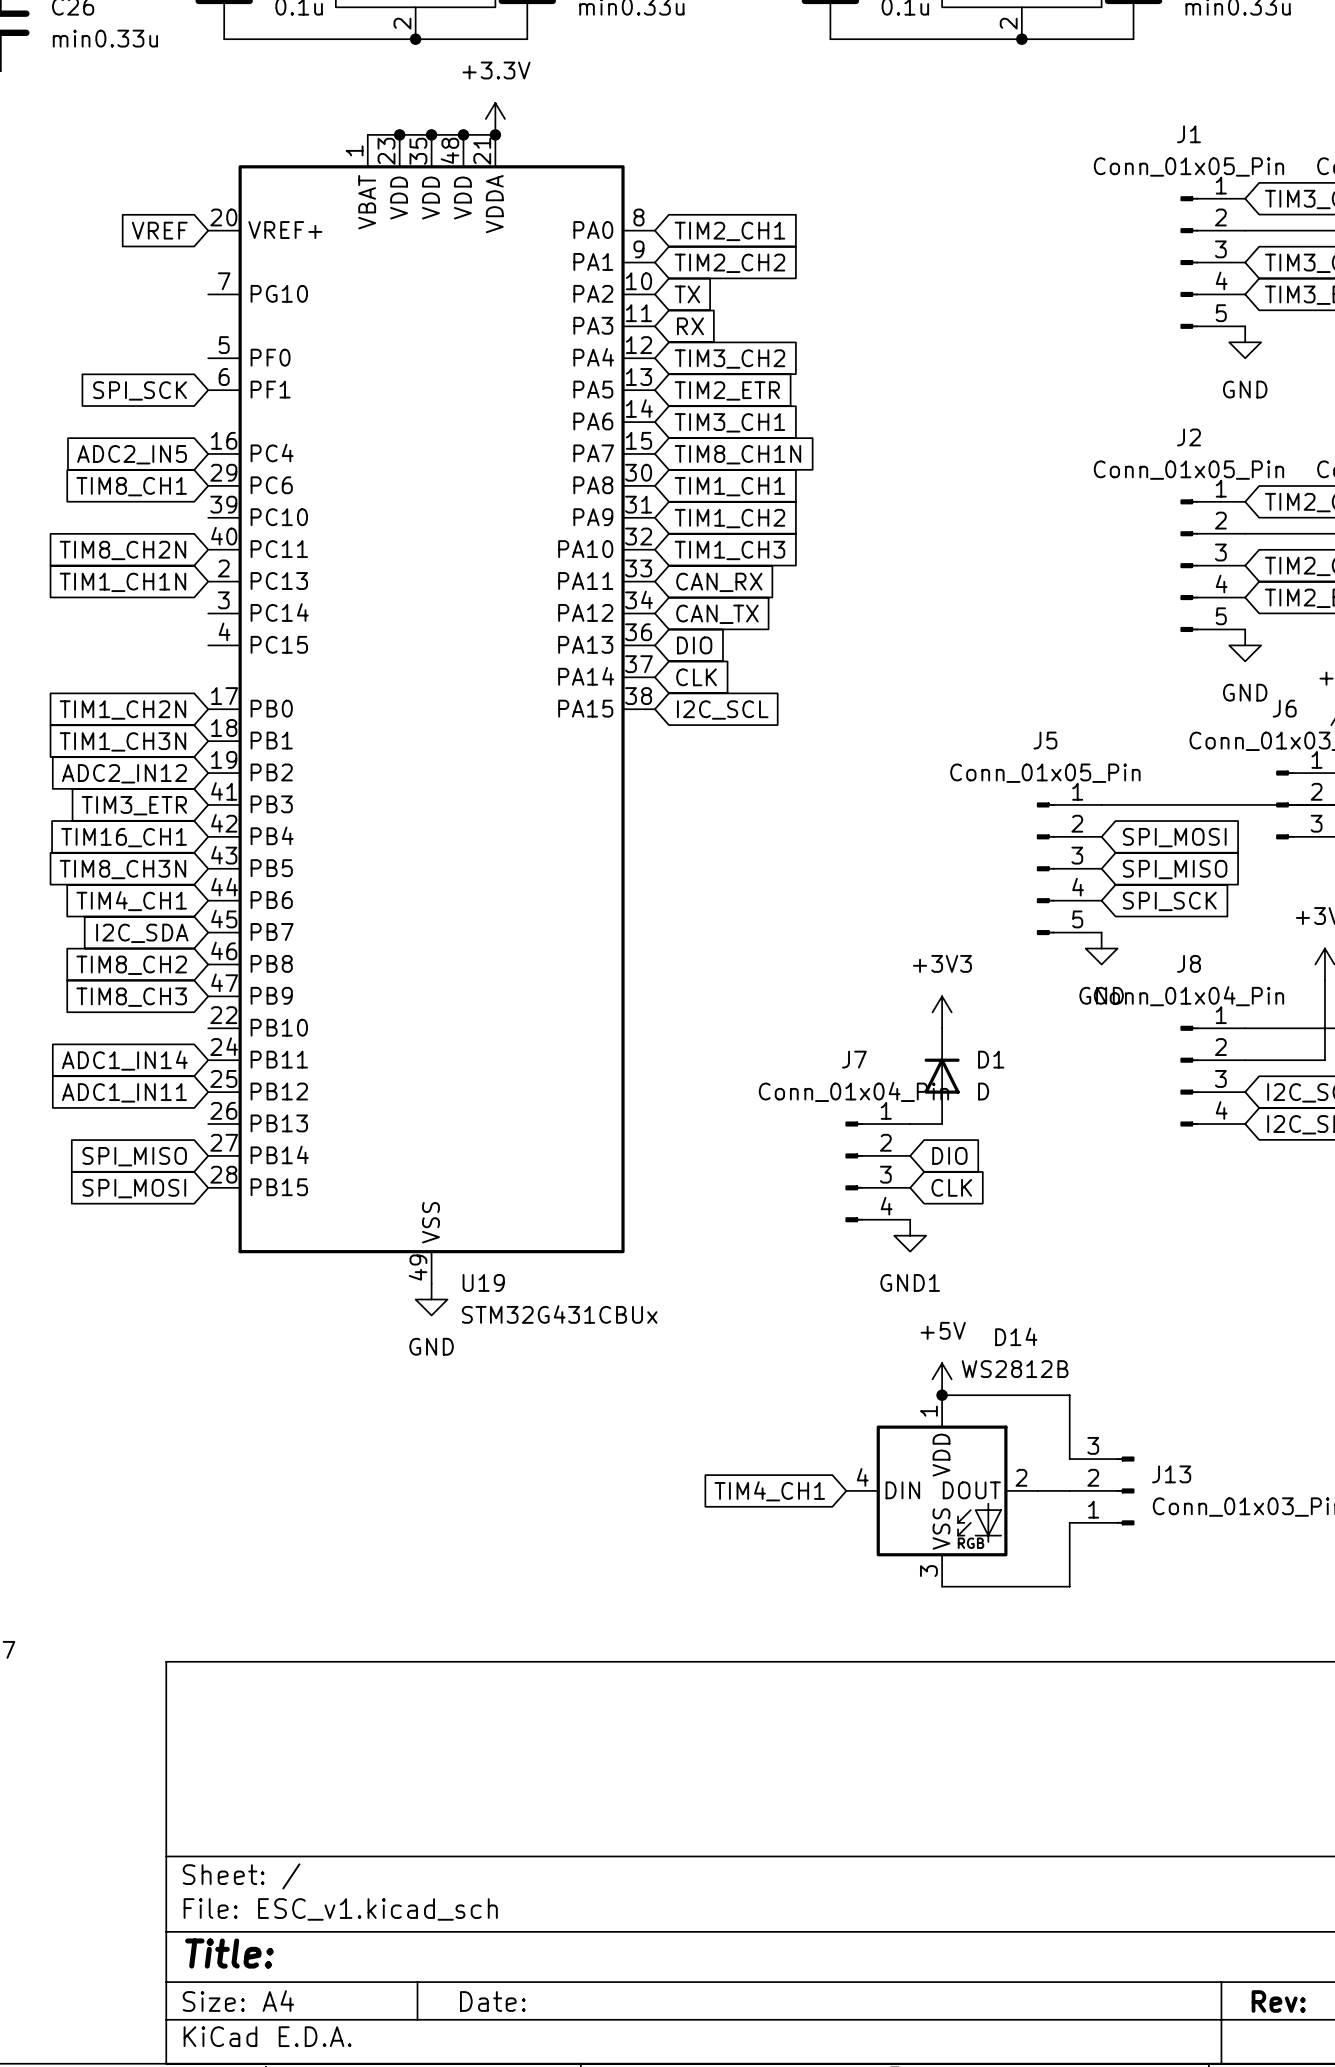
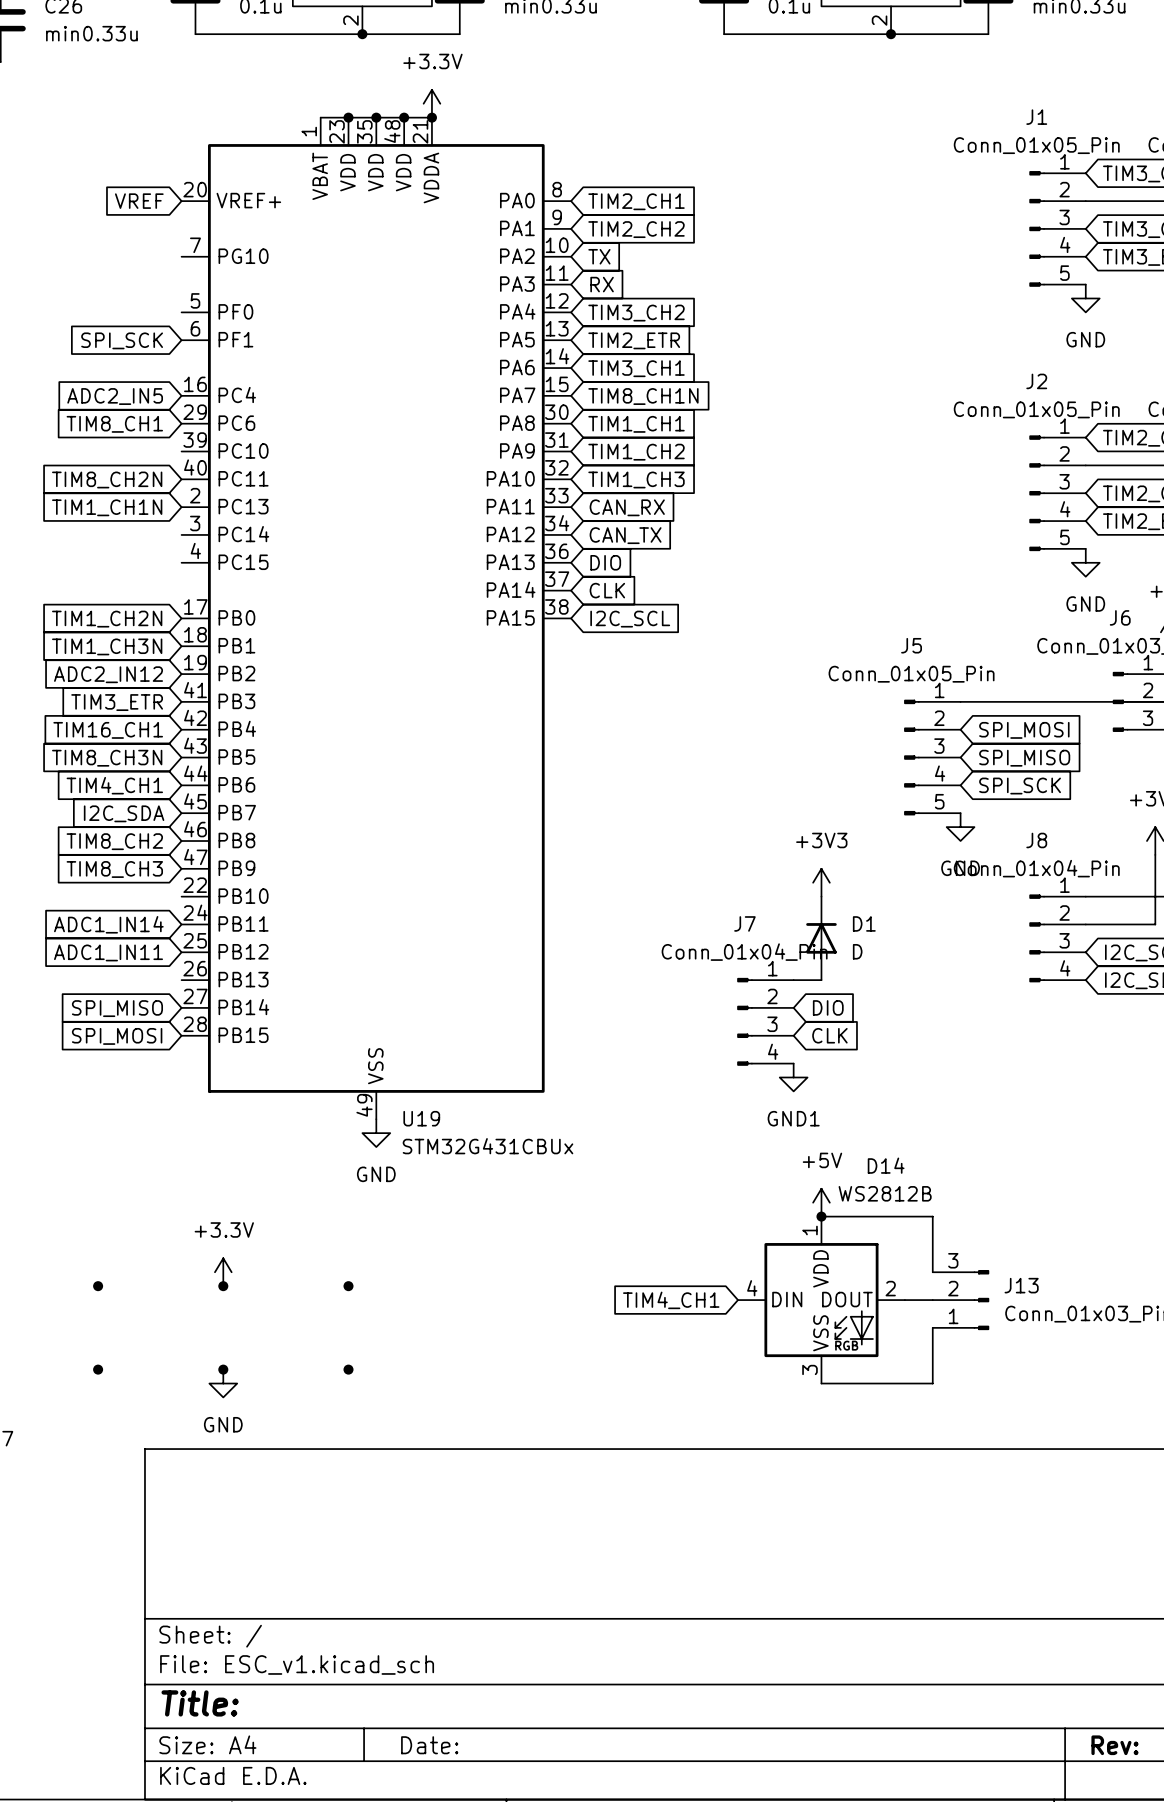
power symbol: none -> +3.3V (223, 1272)
junction: none -> (98, 1286)
junction: none -> (223, 1286)
junction: none -> (348, 1286)
junction: none -> (98, 1369)
junction: none -> (223, 1369)
junction: none -> (348, 1369)
power symbol: none -> GND (223, 1383)

